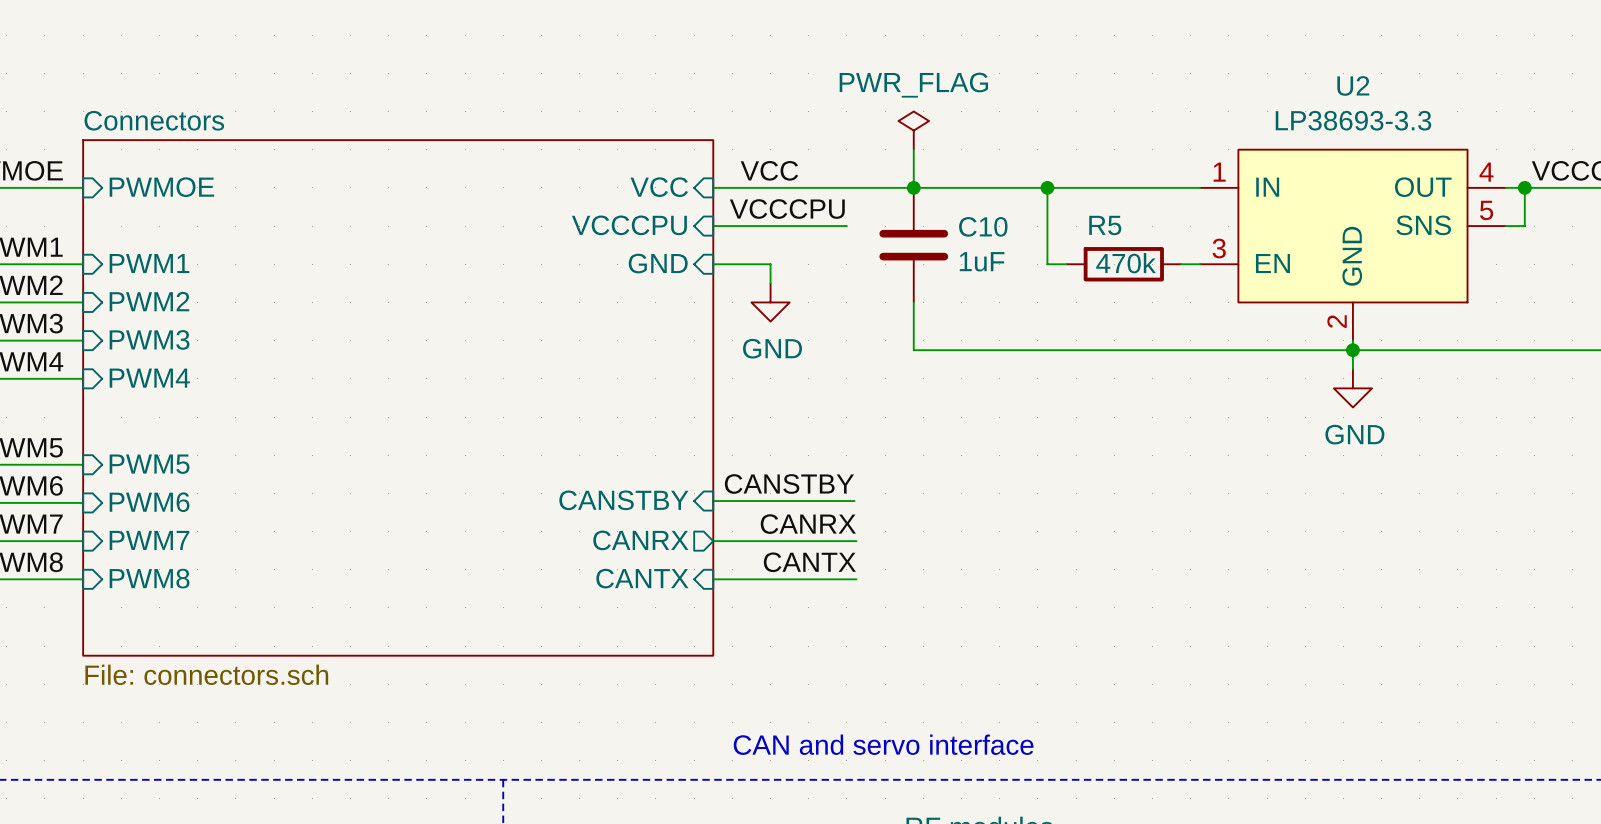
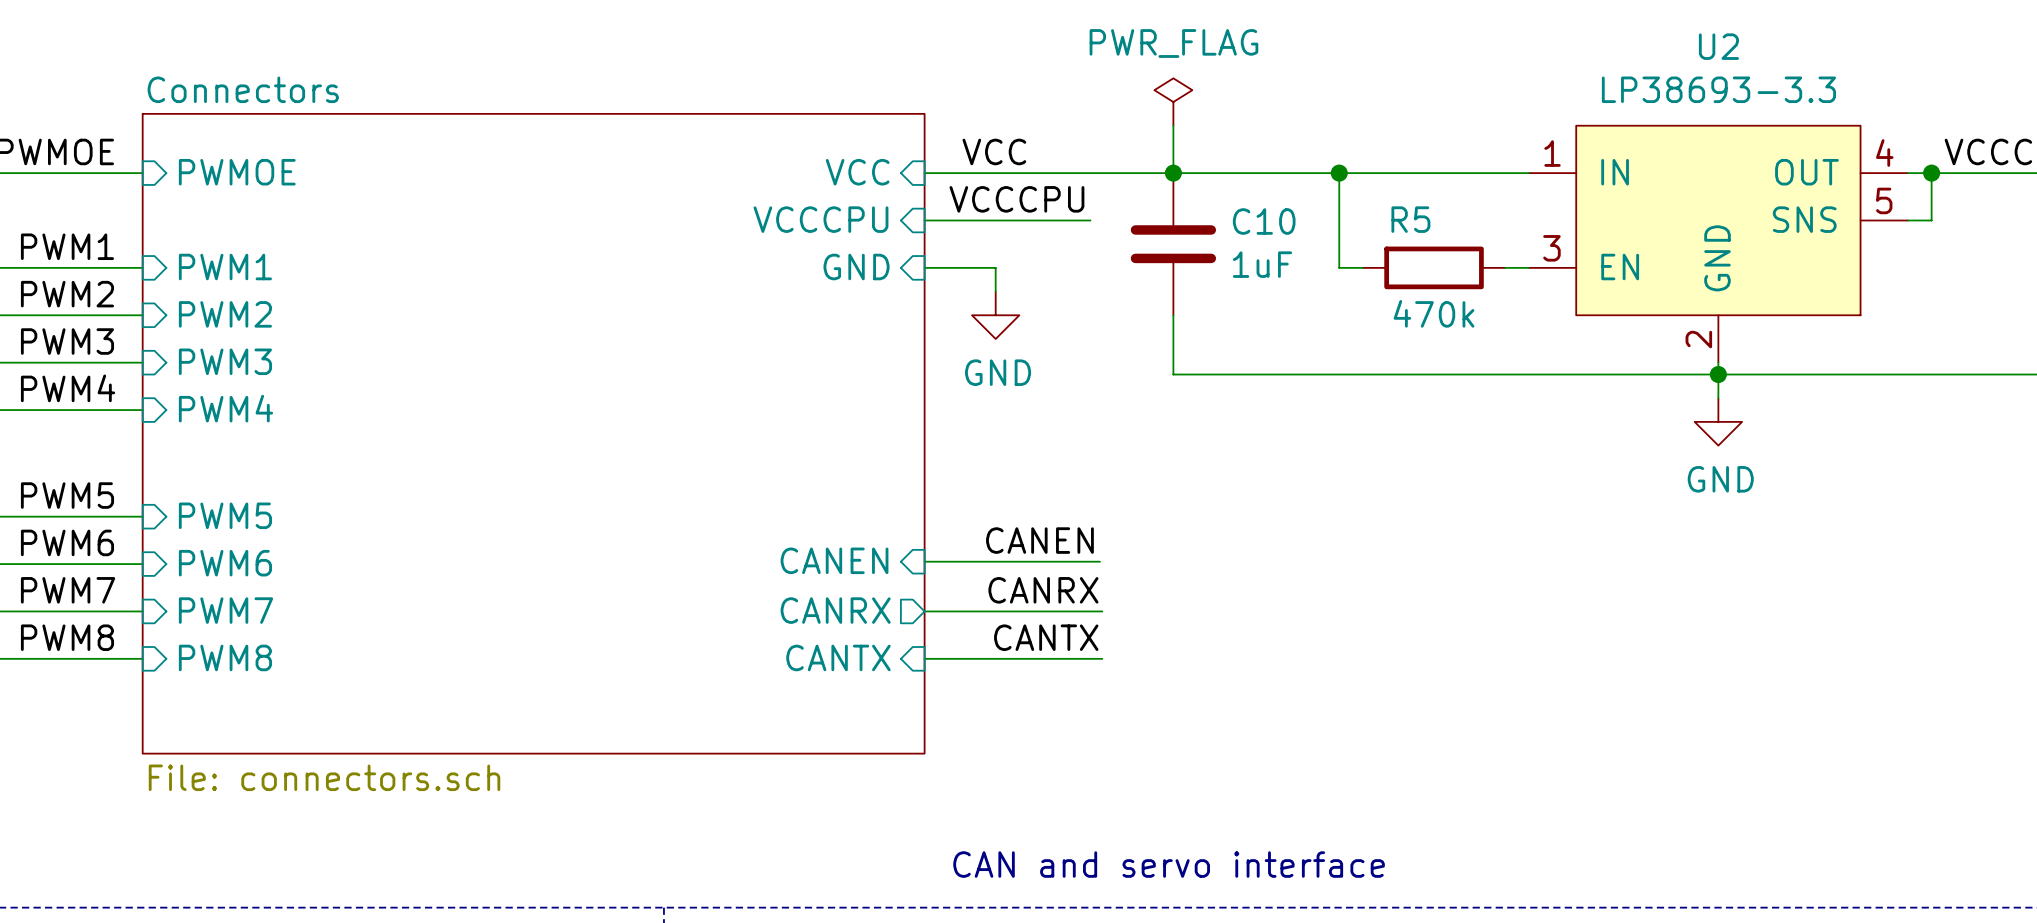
R5 value position: 470k (1126, 263) -> 470k (1434, 313)
label: CANSTBY (789, 483) -> CANEN (1039, 540)
sheet pin: CANSTBY (623, 500) -> CANEN (834, 560)

